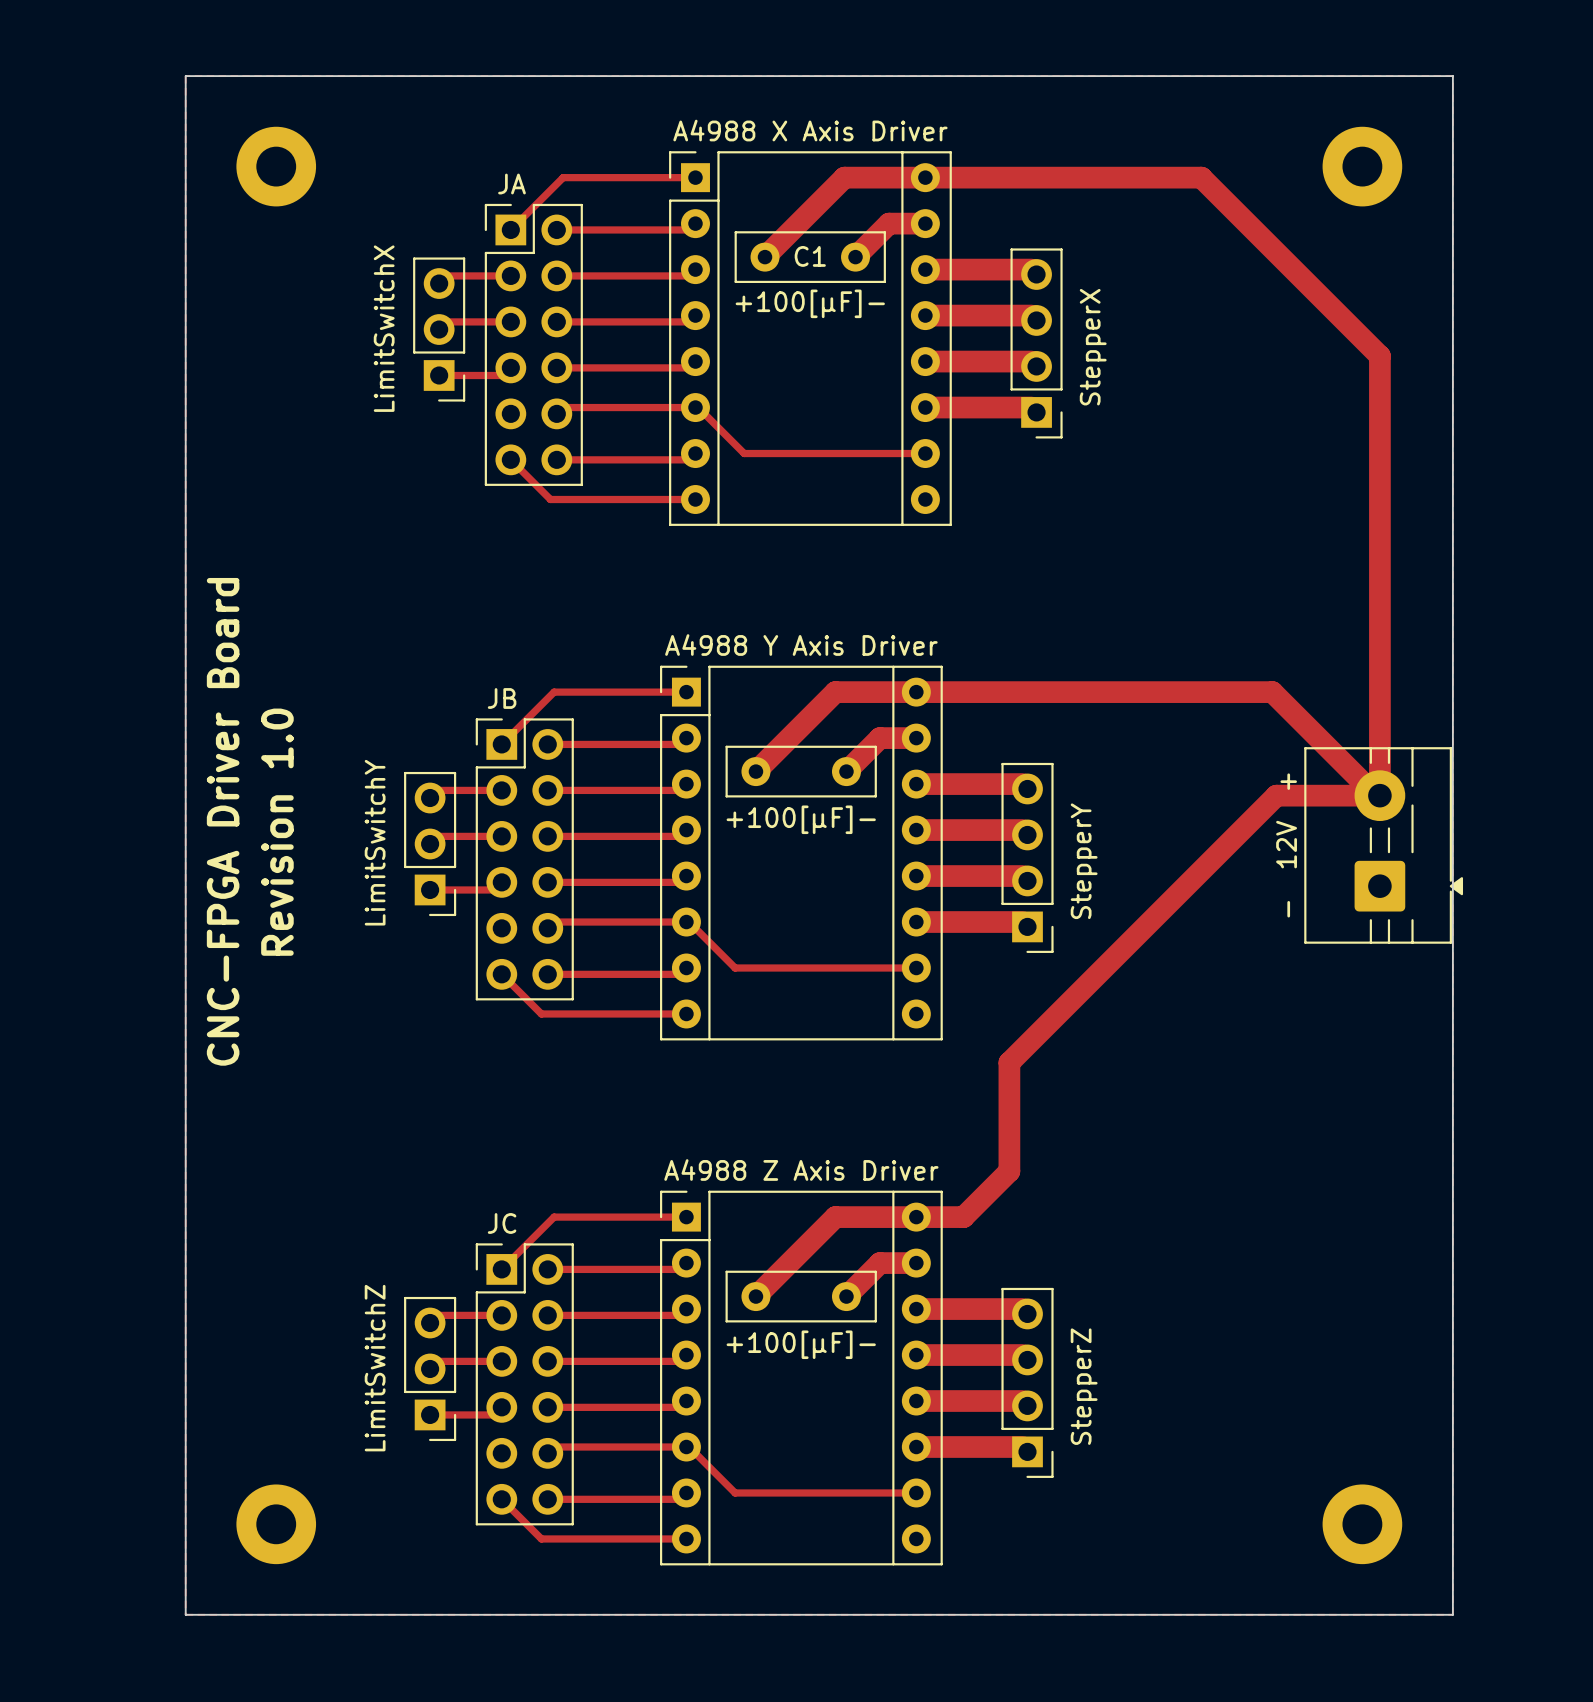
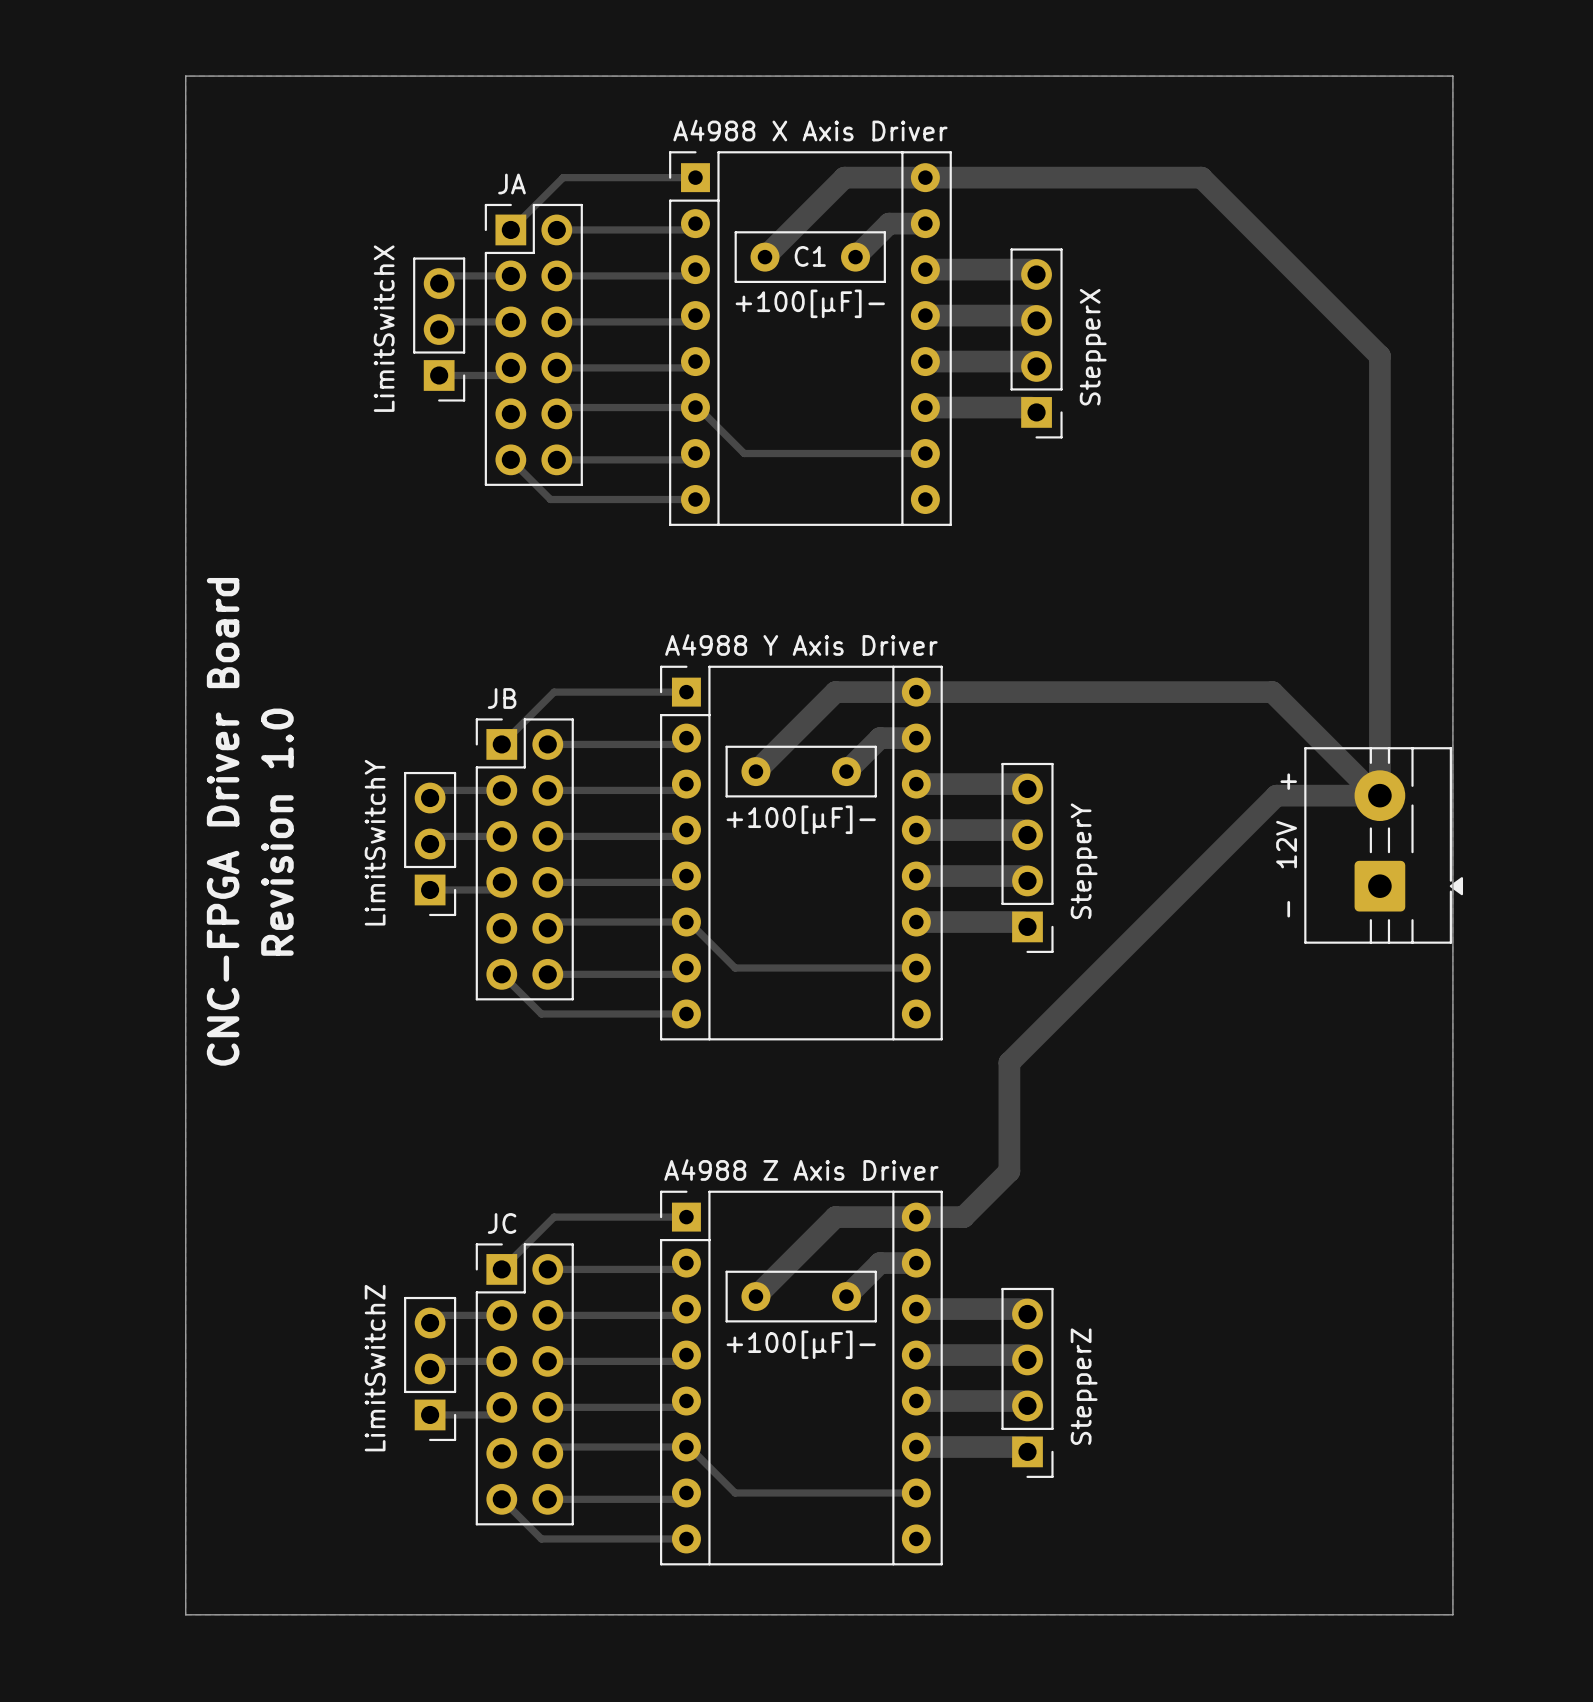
part: (276, 166) -> none
part: (1362, 166) -> none
part: (276, 1524) -> none
part: (1362, 1524) -> none

